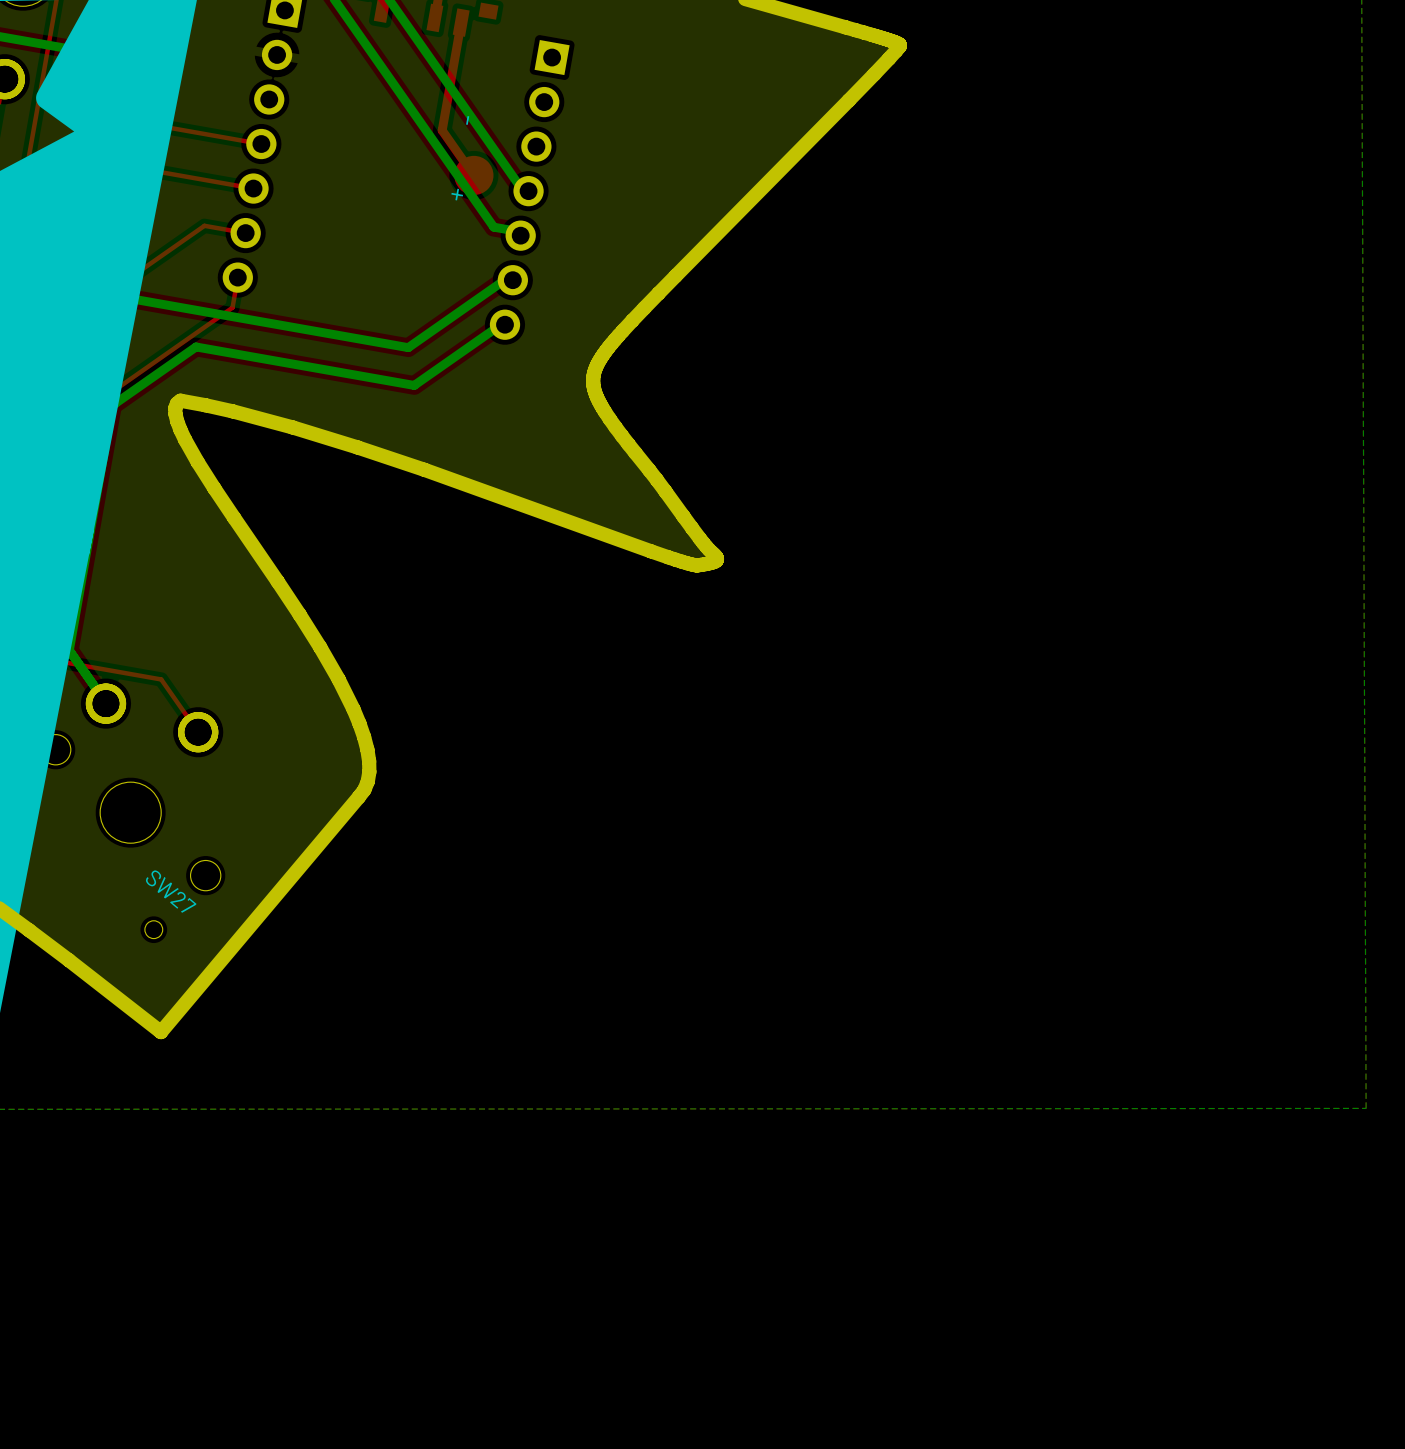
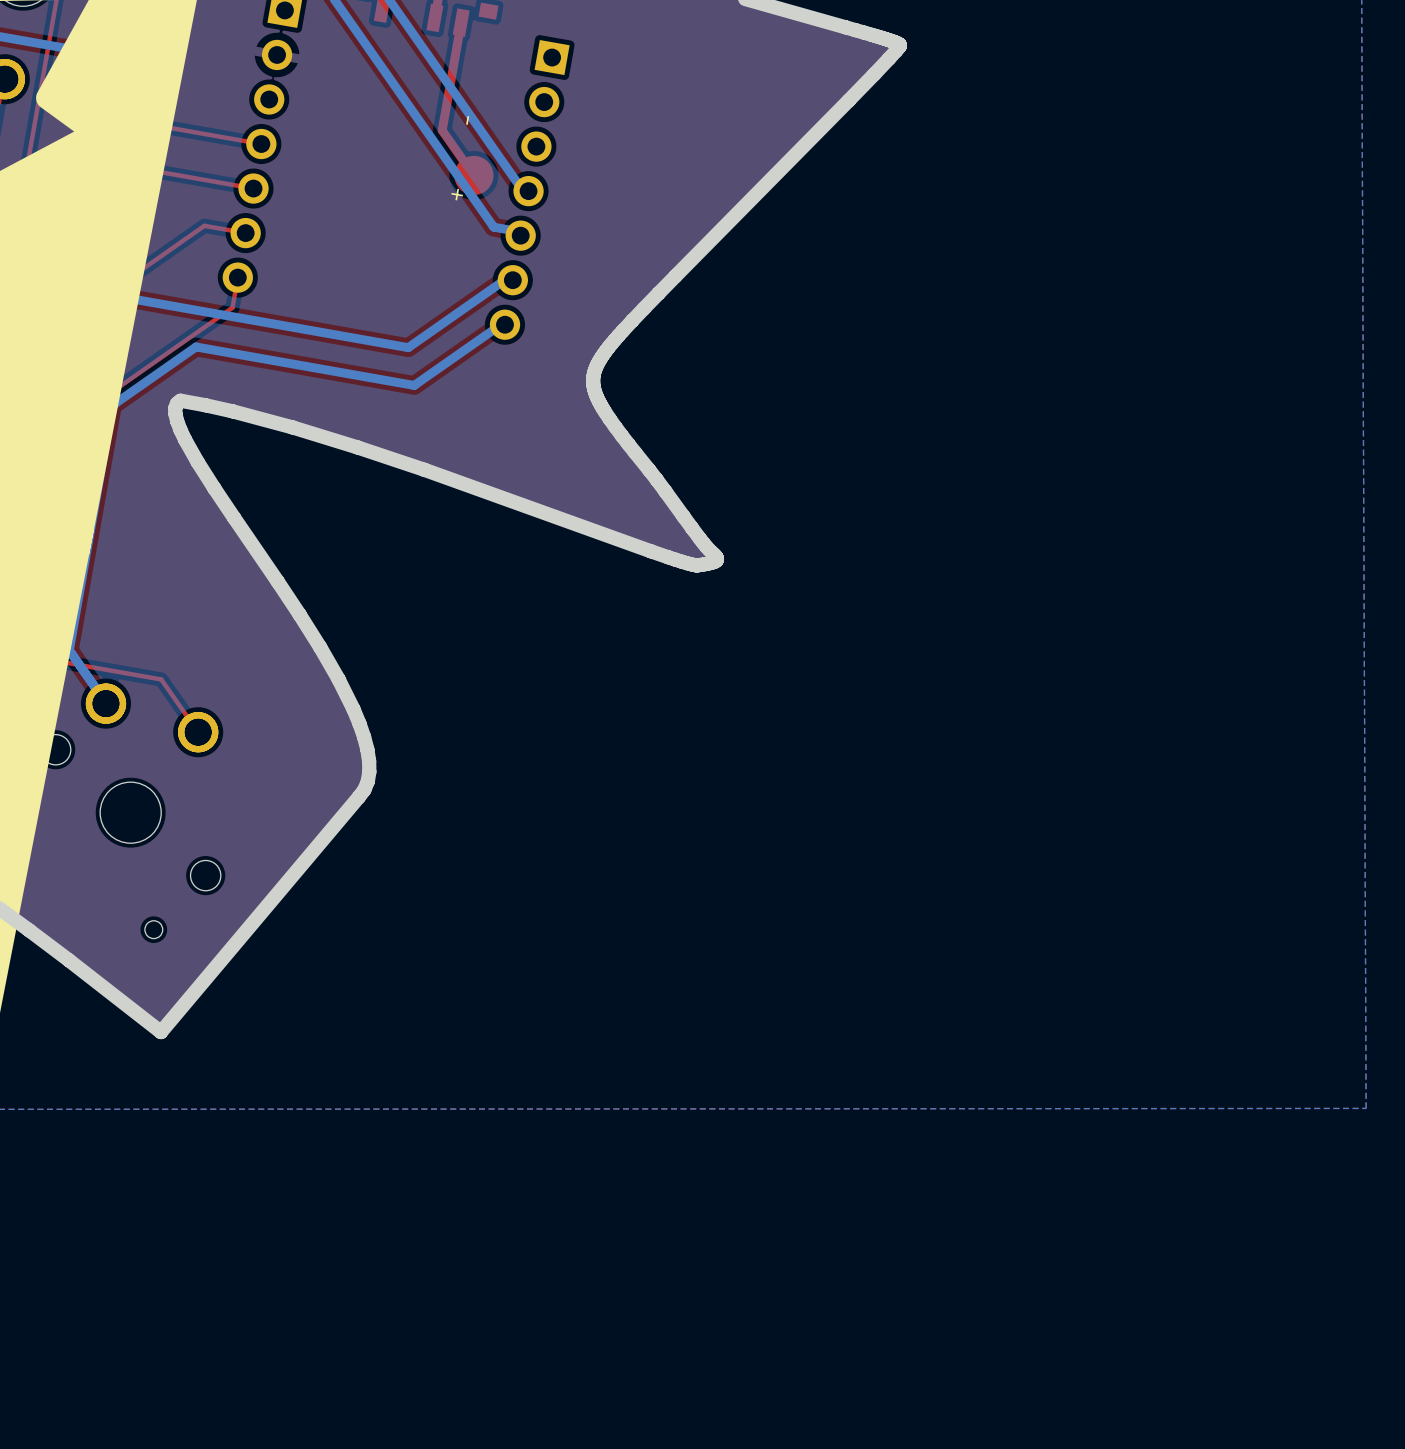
SW27 name: SW27 (171, 891) -> none

